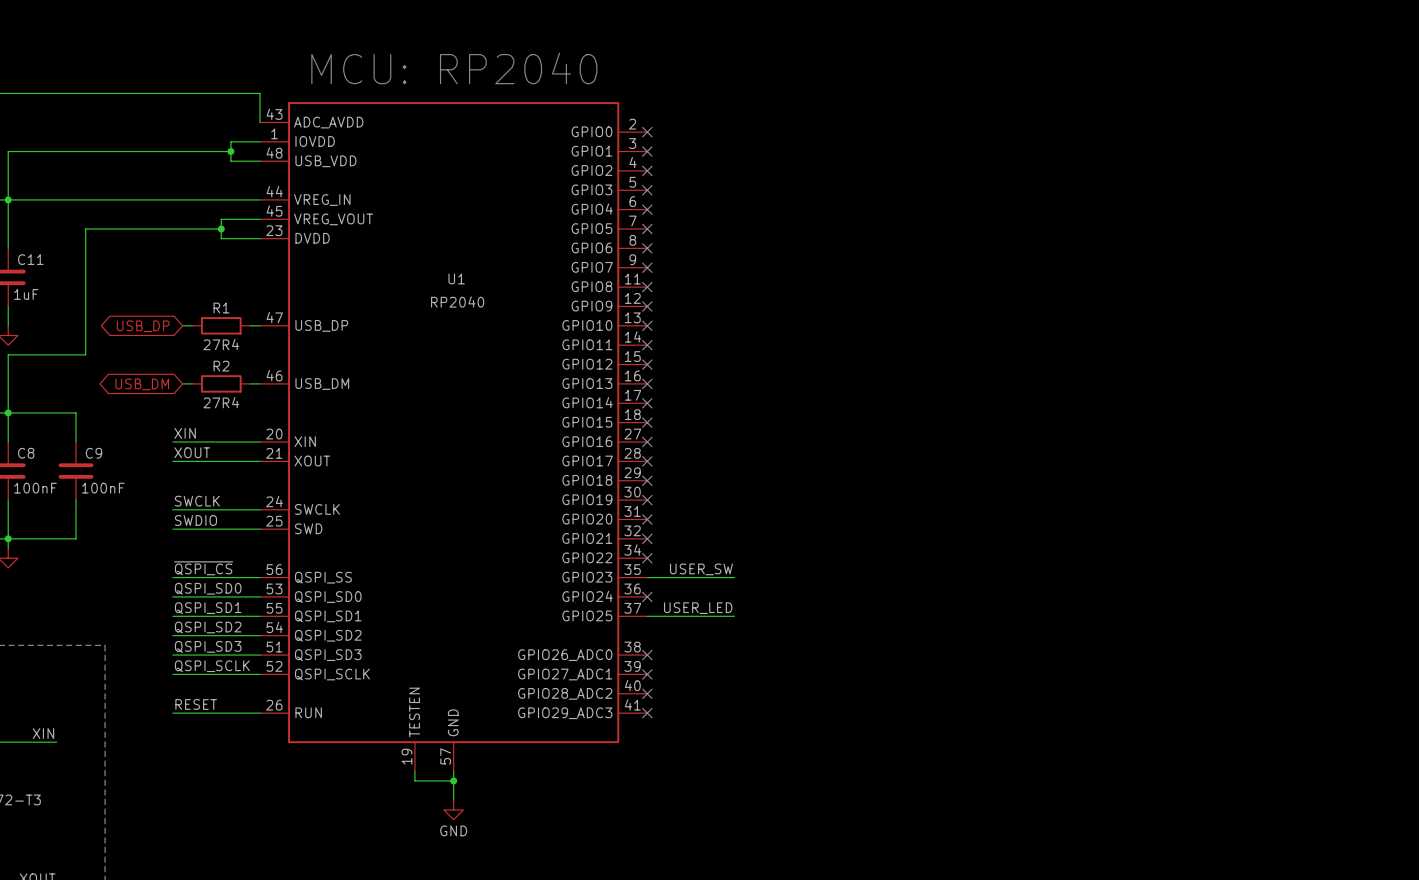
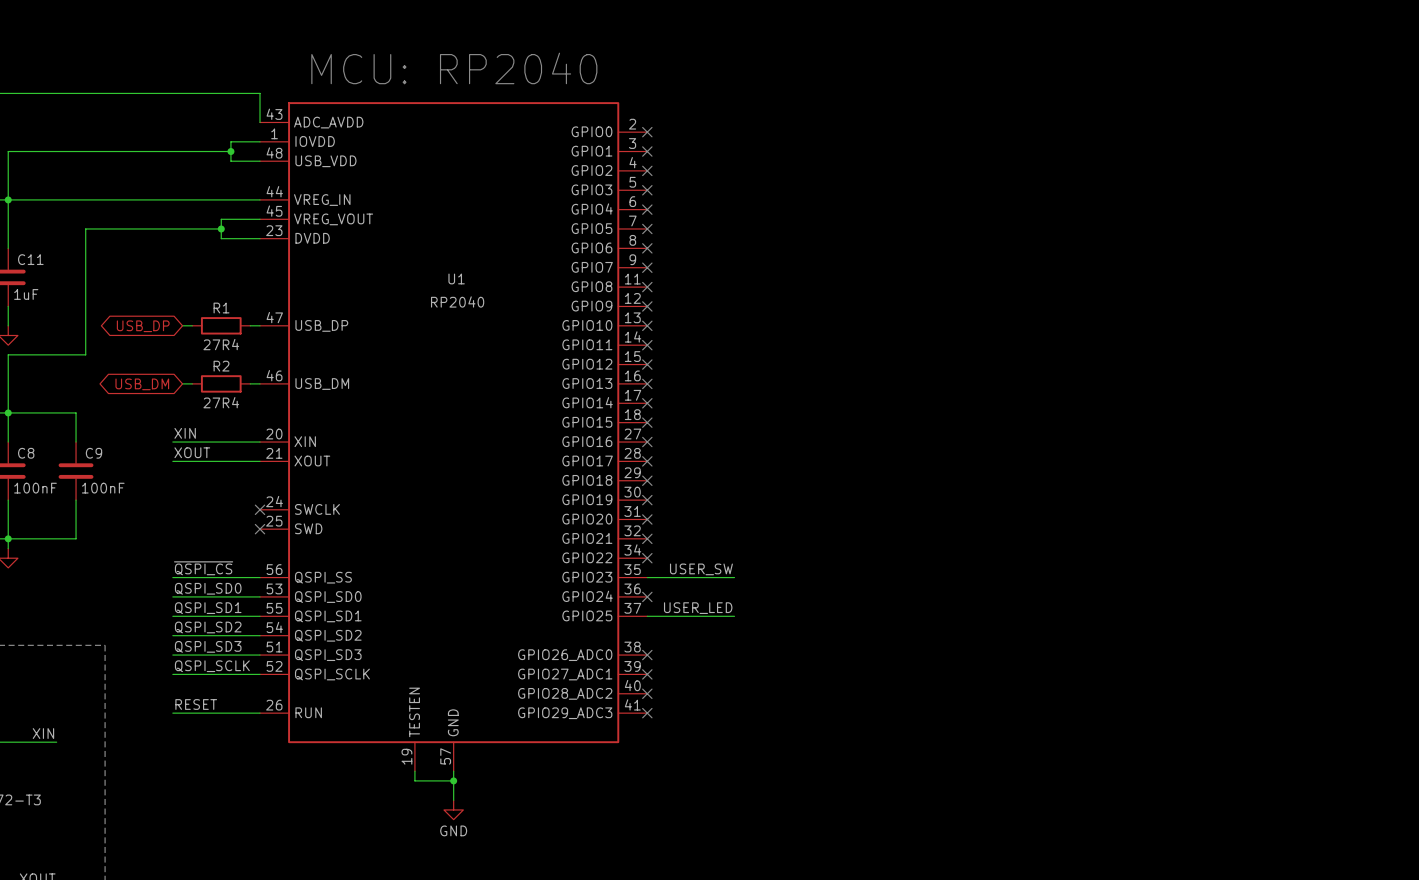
label: SWCLK (197, 501) -> none
wire: (172, 509) (260, 509) -> none
no-connect mark: none -> (260, 509)
label: SWDIO (195, 520) -> none
wire: (172, 529) (260, 529) -> none
no-connect mark: none -> (260, 529)

